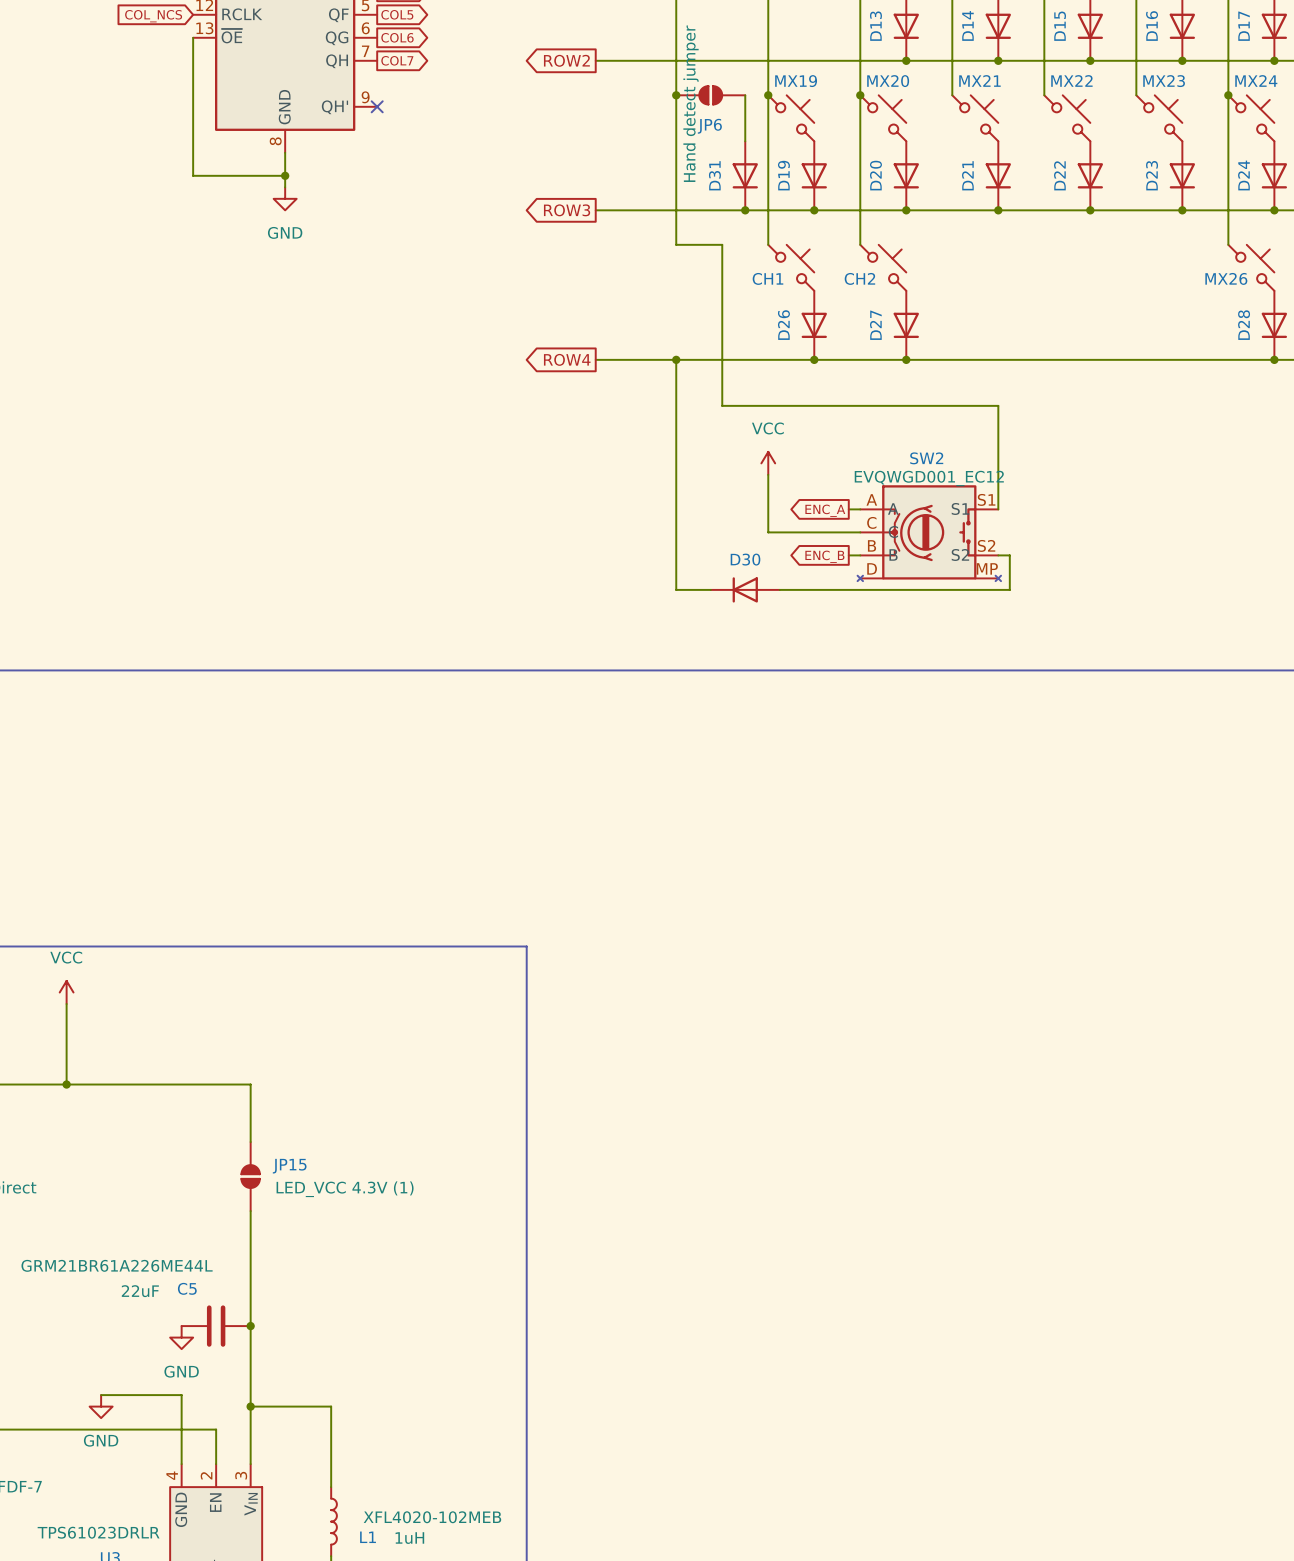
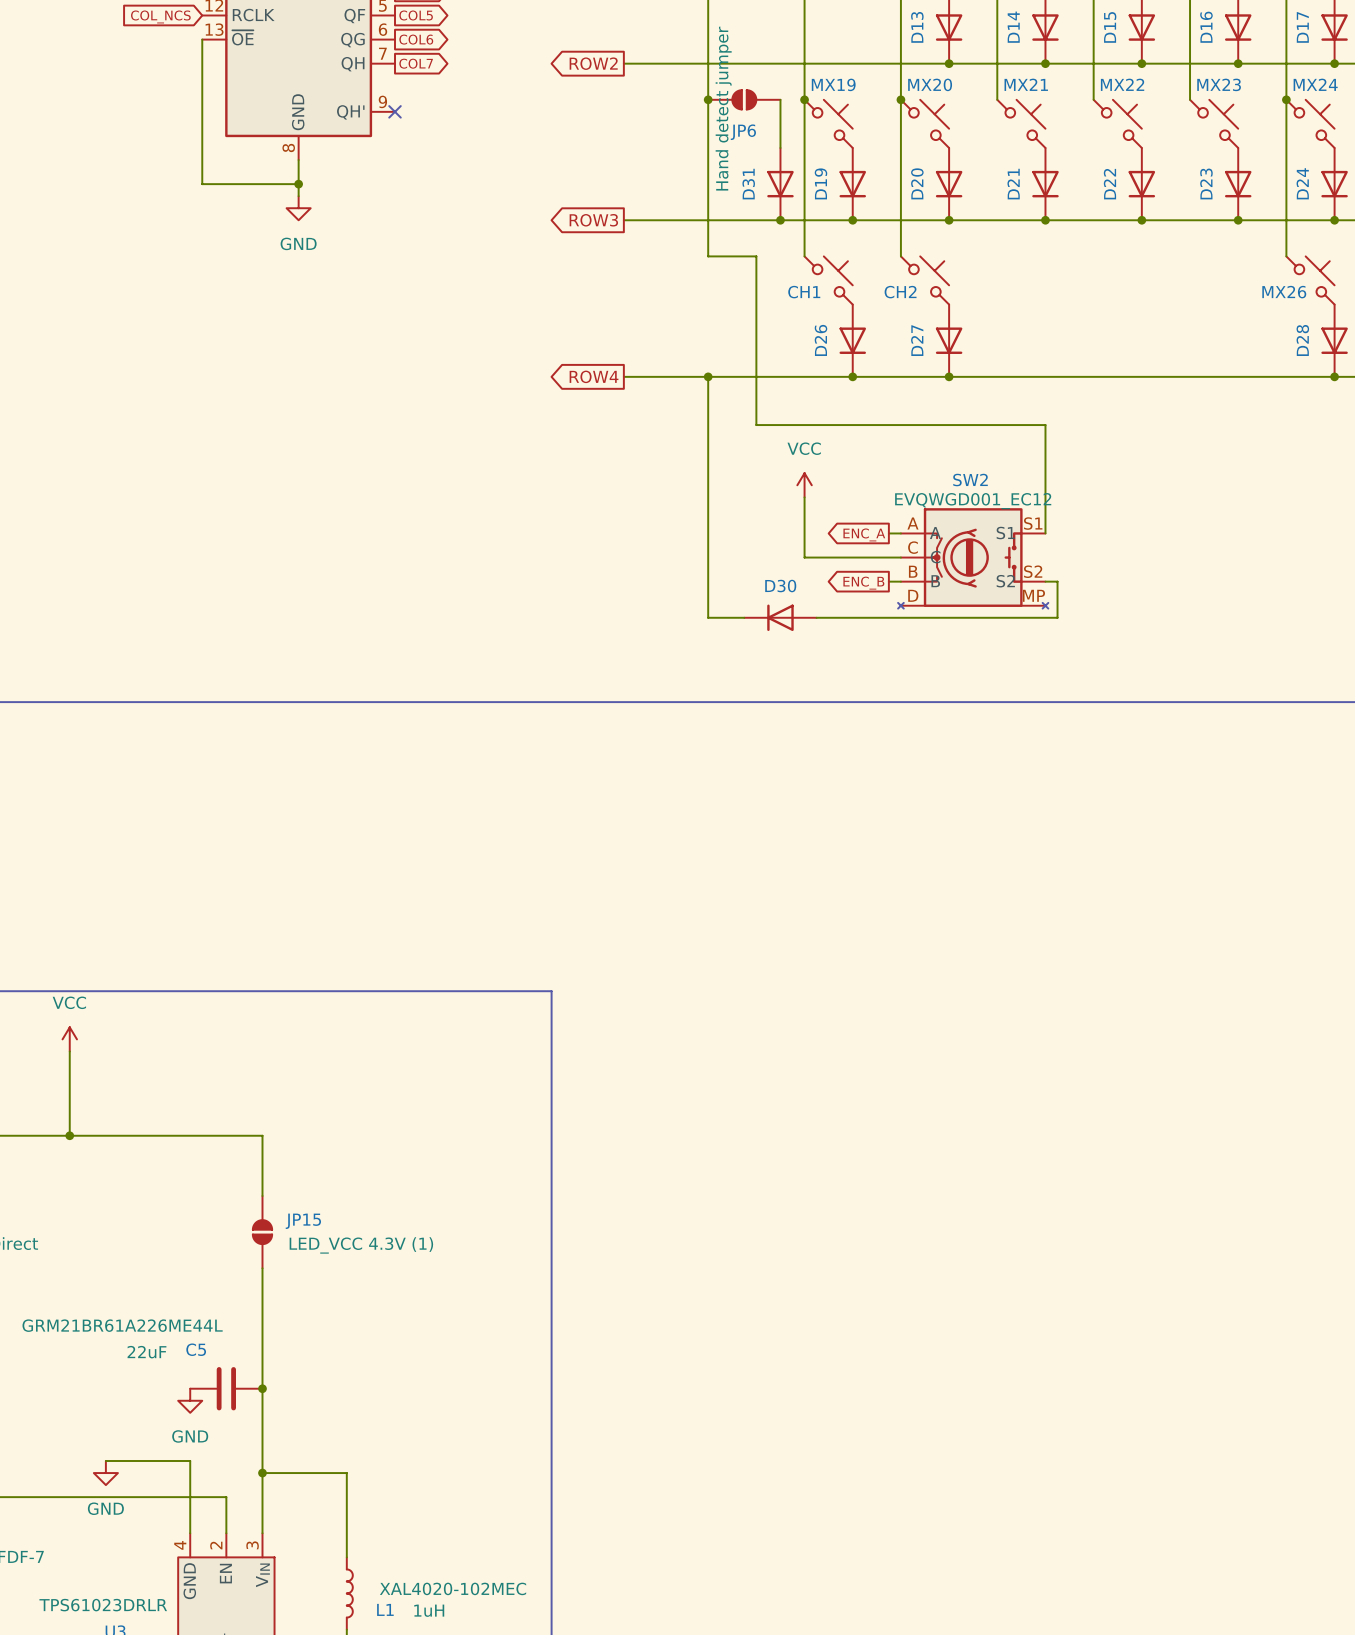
L1 value: XFL4020-102MEB (432, 1517) -> XAL4020-102MEC (453, 1588)

